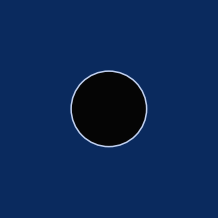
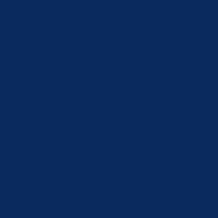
hole: (108, 108) -> none

